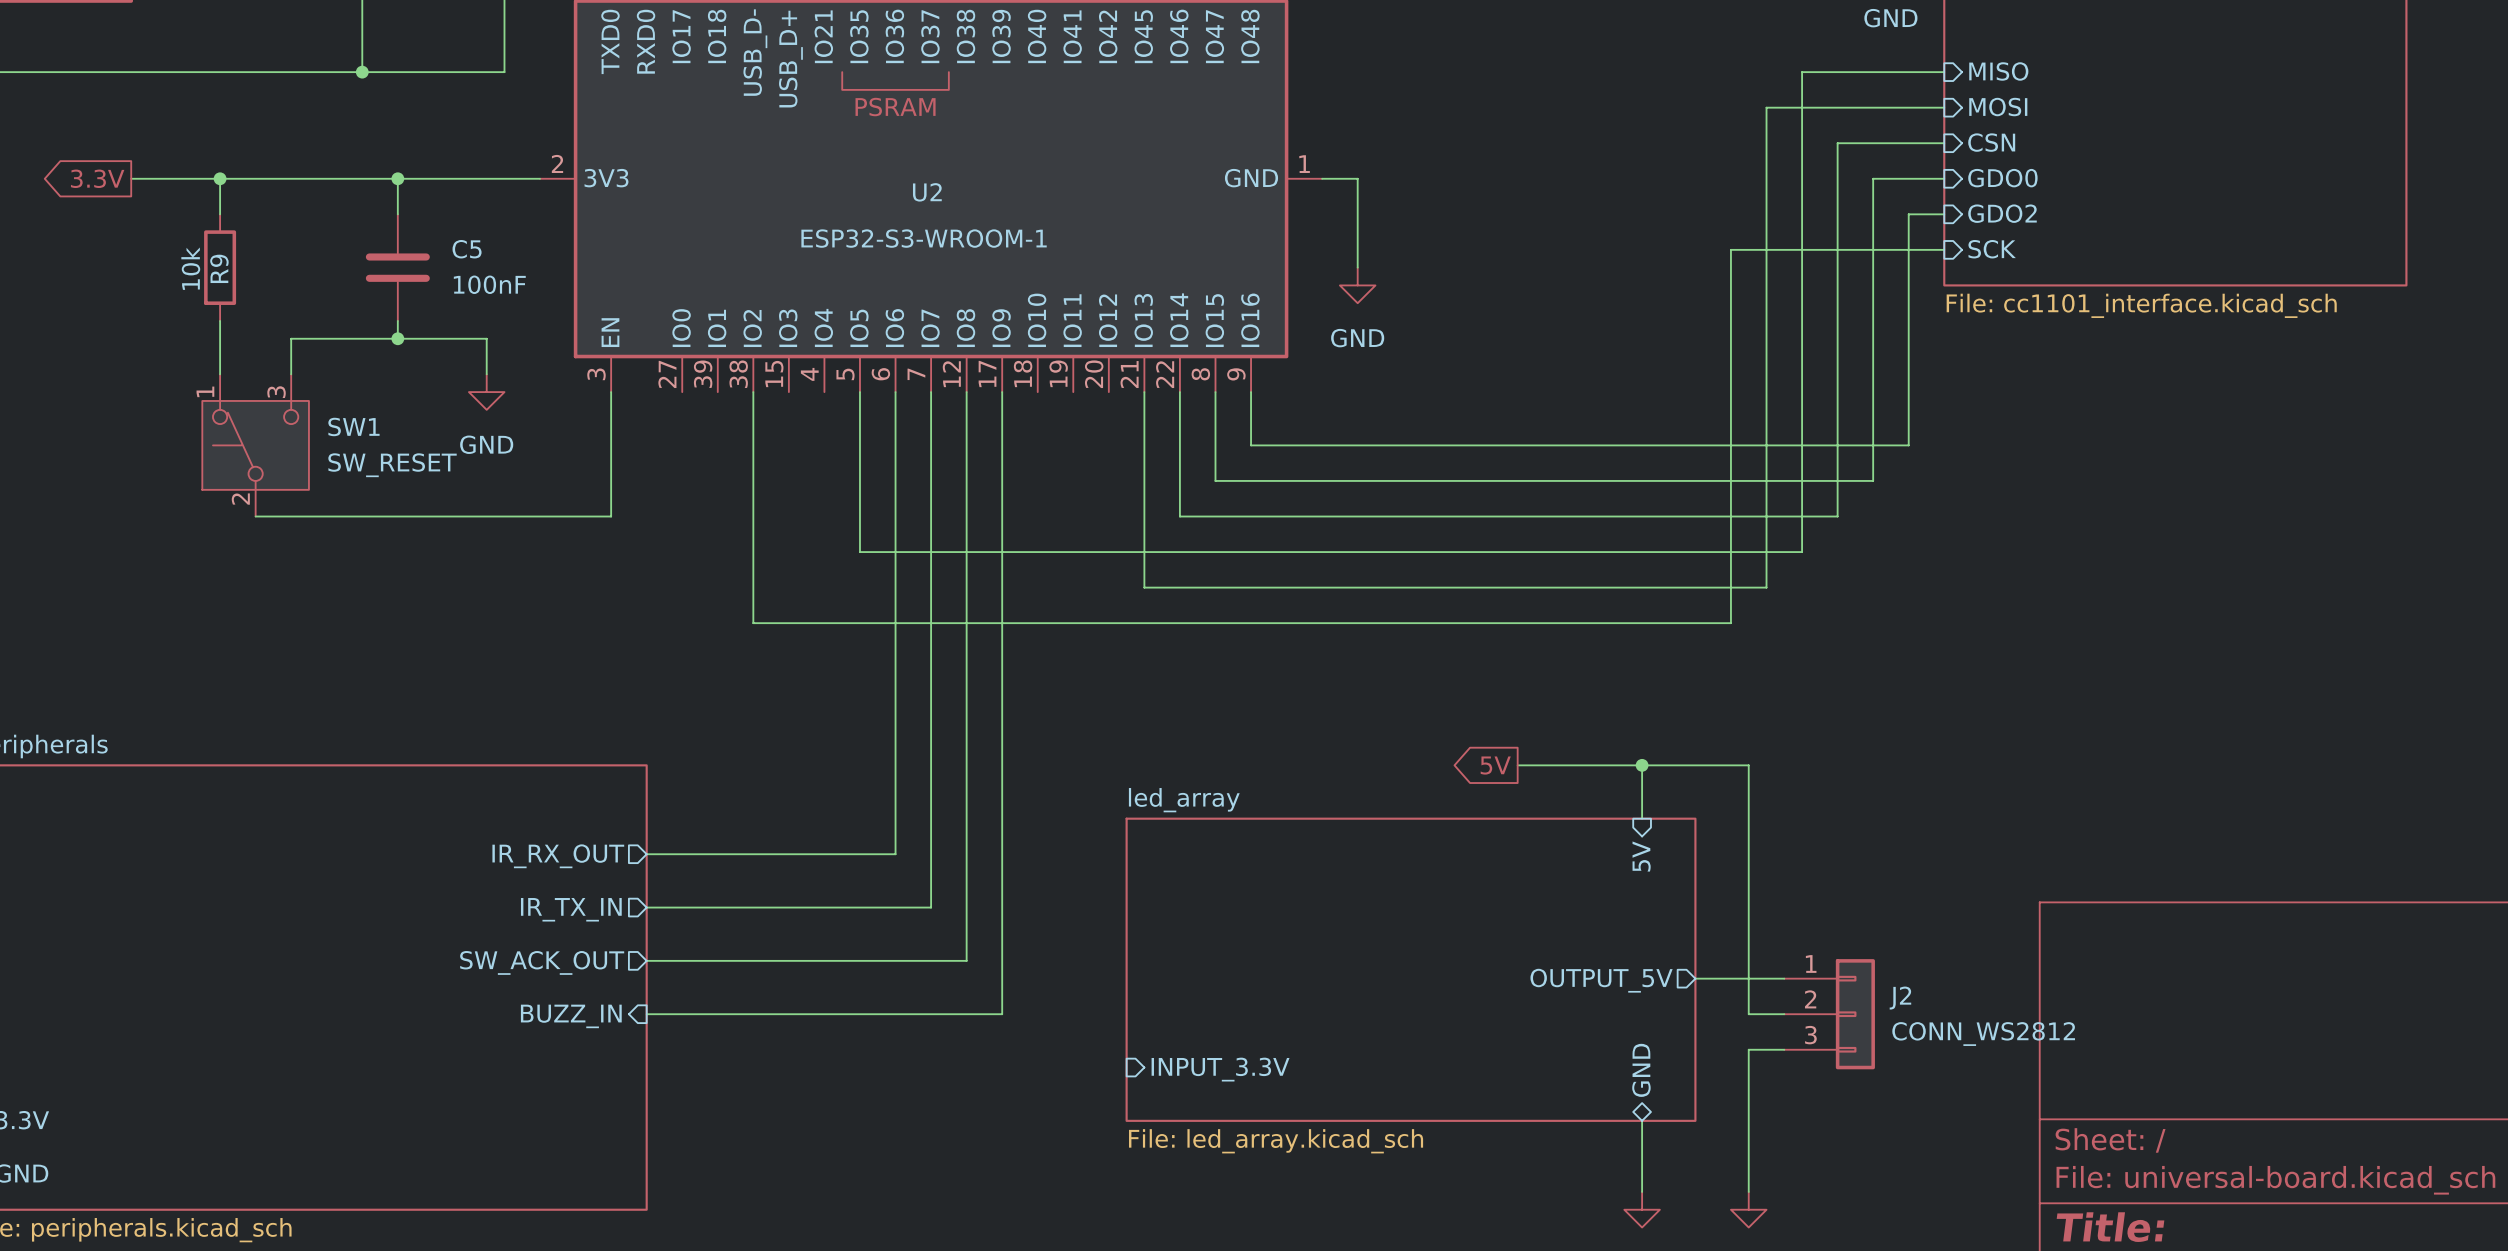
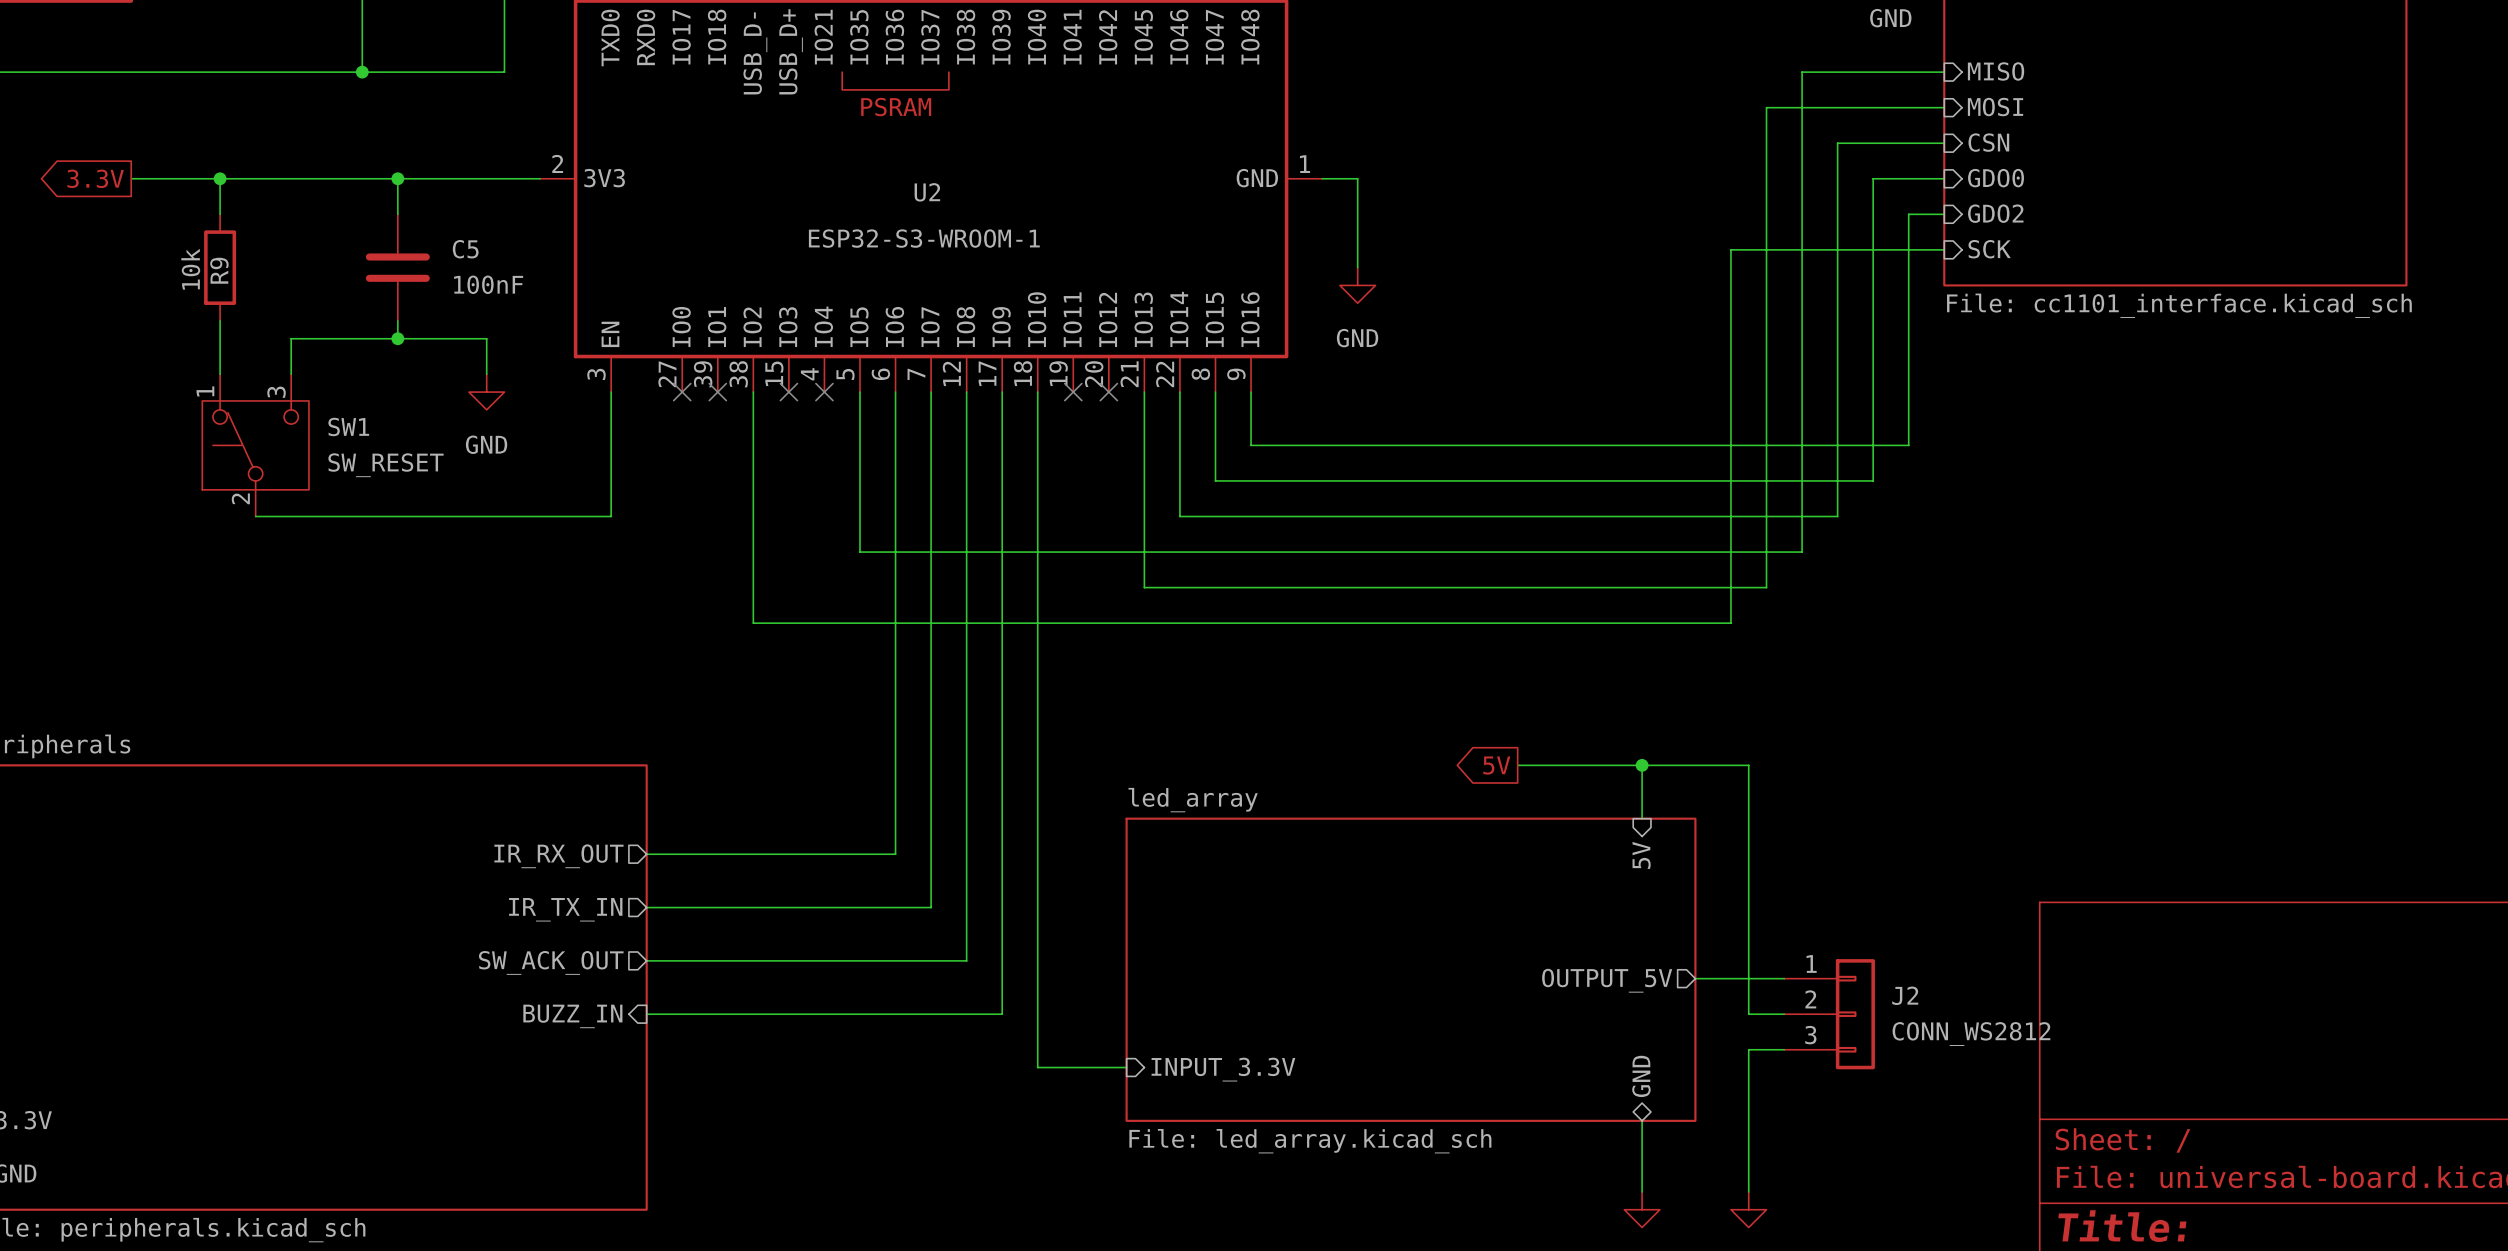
no-connect mark: none -> (682, 392)
no-connect mark: none -> (717, 392)
no-connect mark: none -> (788, 392)
no-connect mark: none -> (824, 392)
wire: none -> (1037, 392) (1037, 1067) (1126, 1067)
no-connect mark: none -> (1073, 392)
no-connect mark: none -> (1108, 392)

